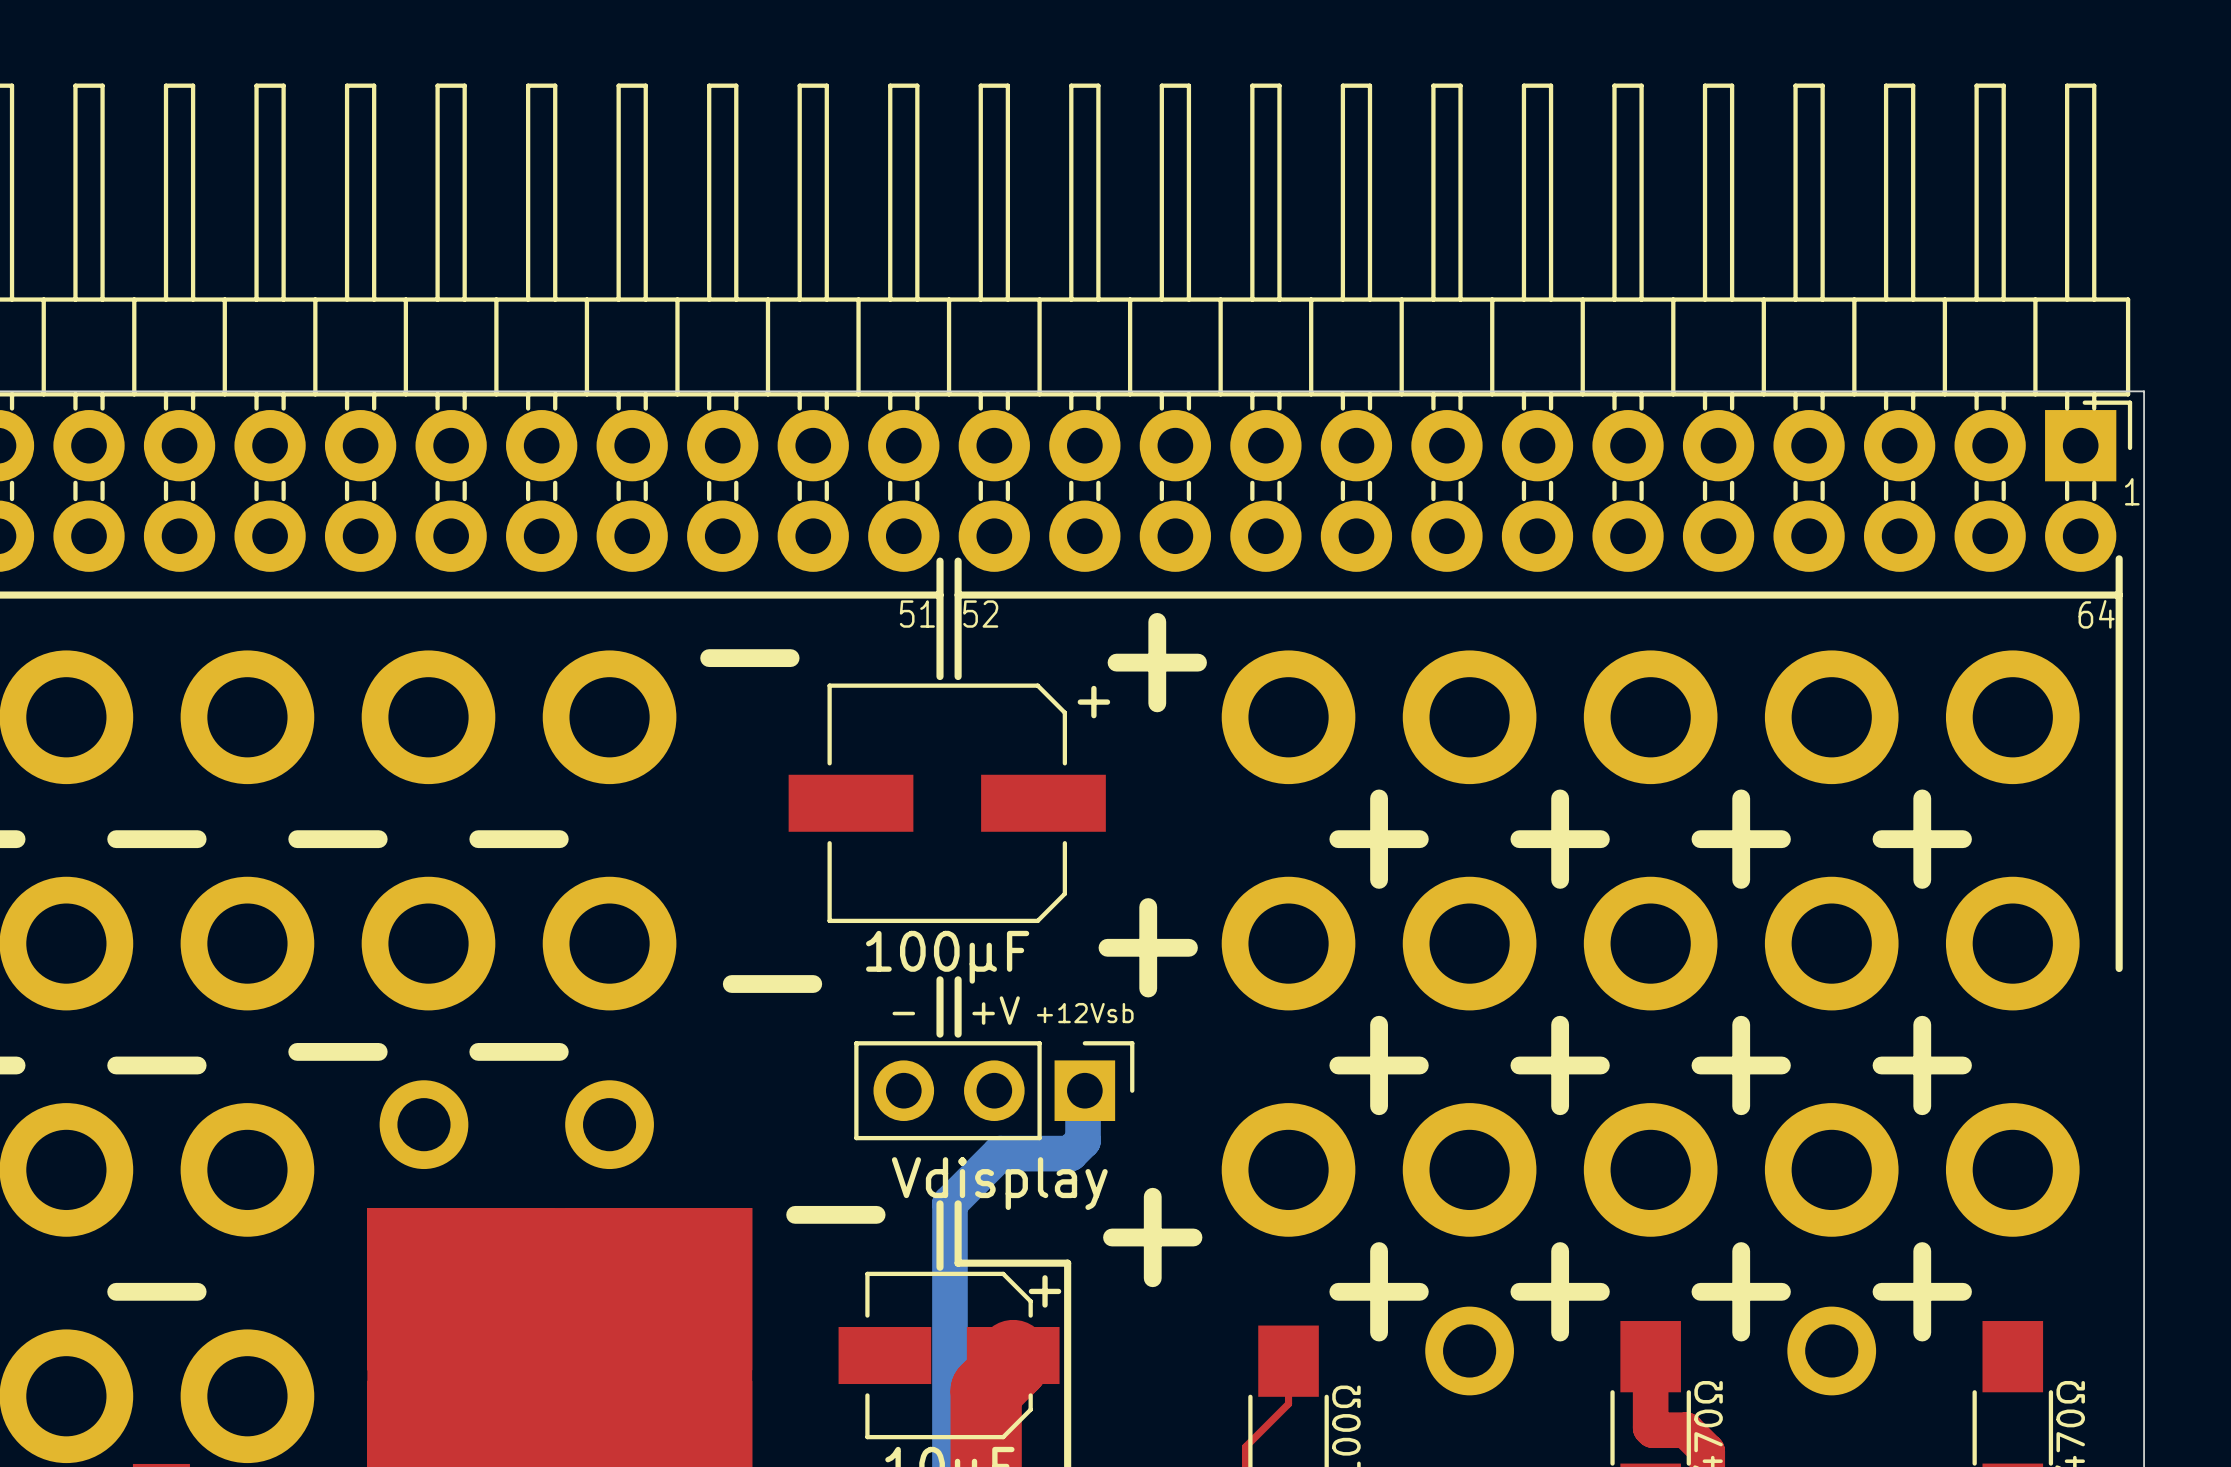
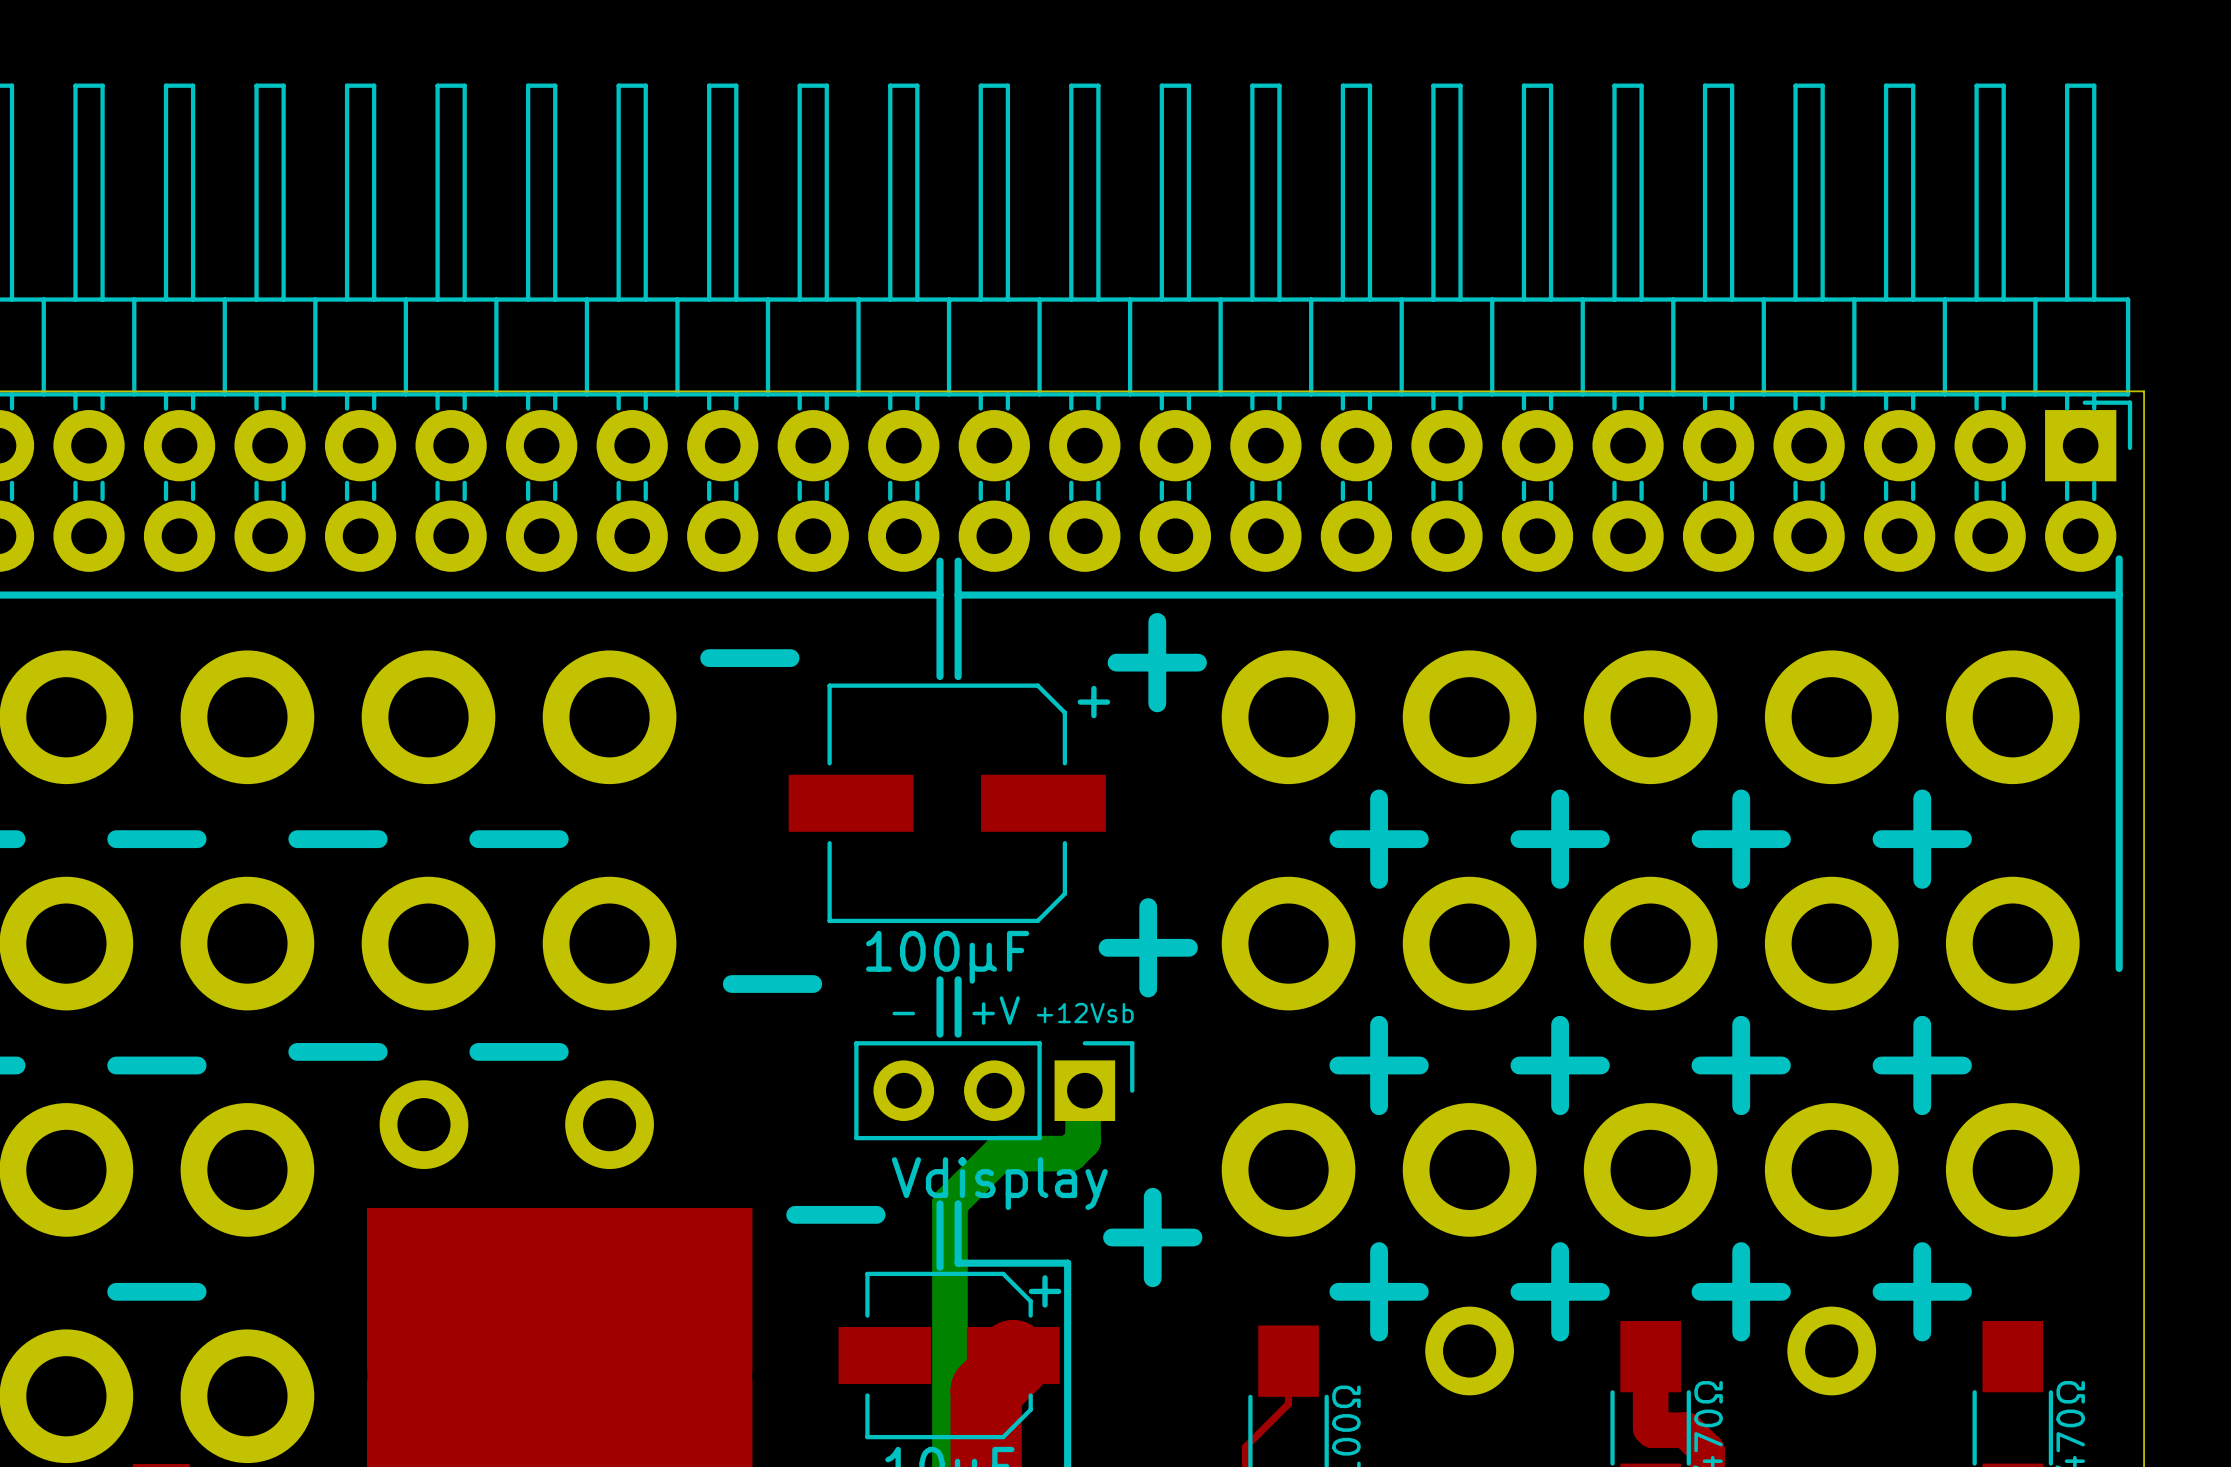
text: 1 (2132, 491) -> none
text: 51 (917, 614) -> none
text: 52 (980, 614) -> none
text: 64 (2096, 614) -> none

